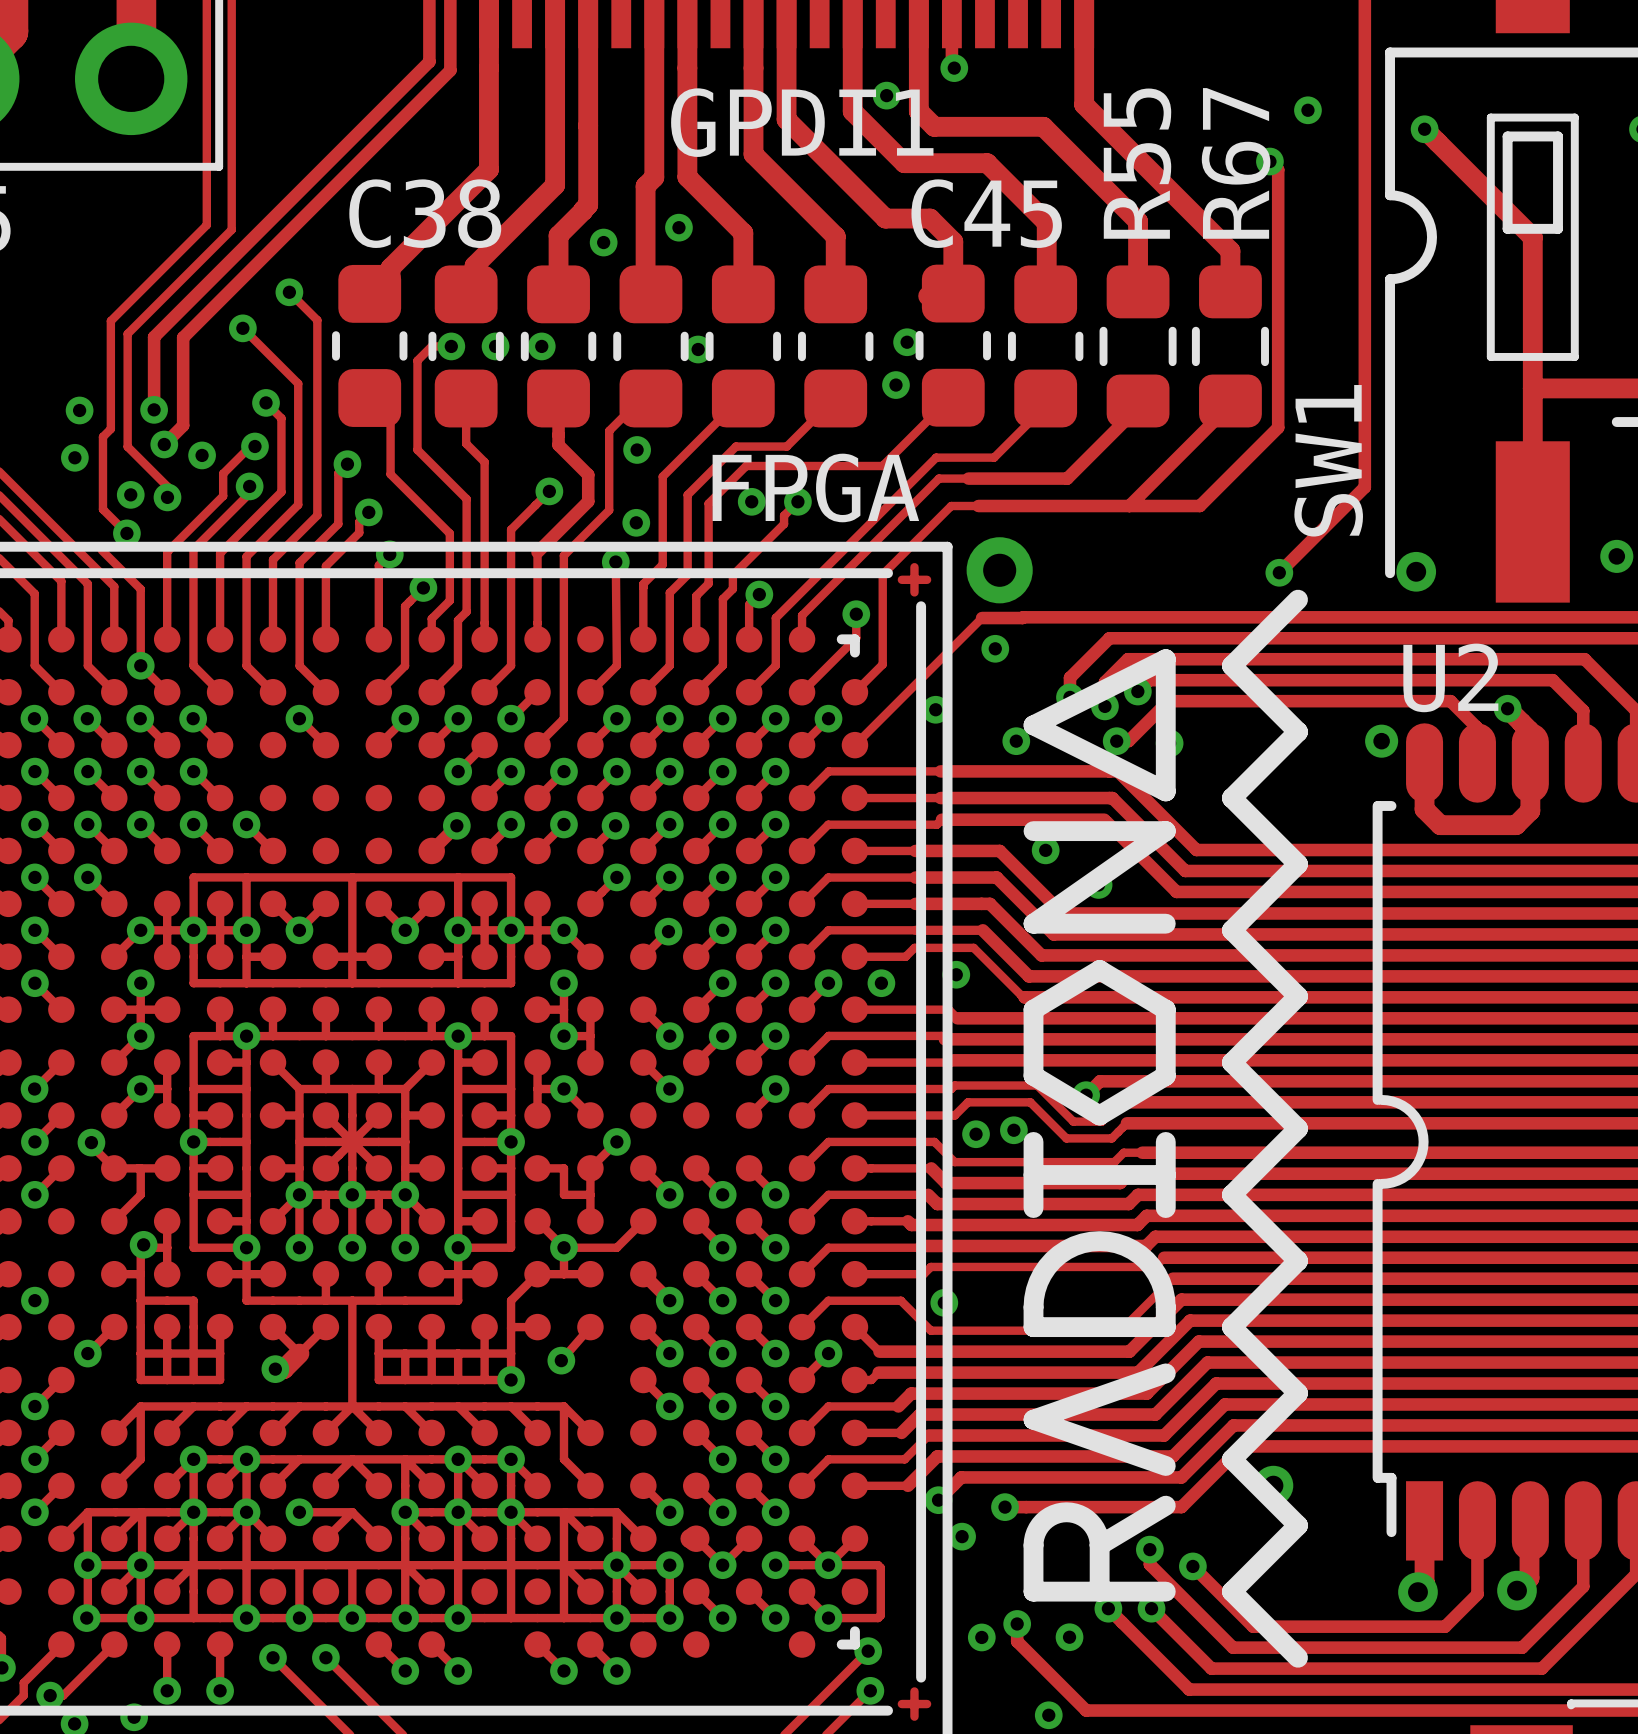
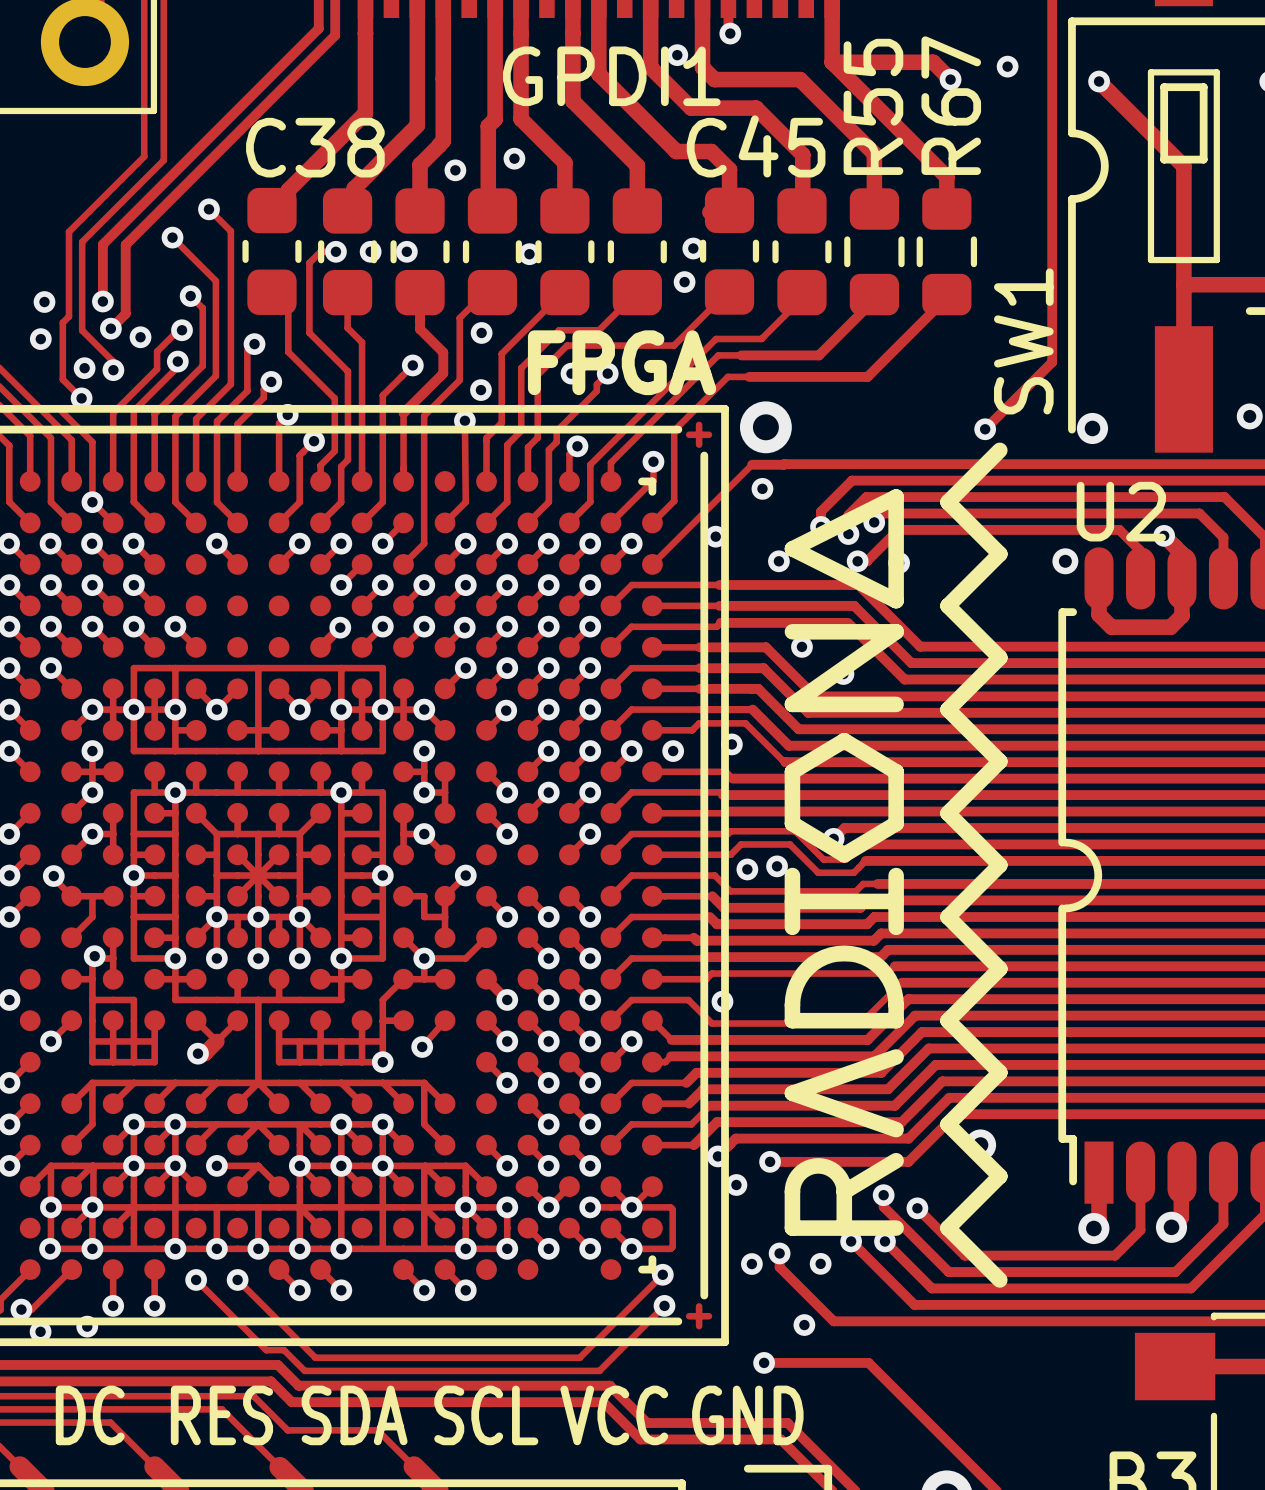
track: none -> (832, 62) (933, 62) (950, 79)
track: (1269, 161) (1278, 169) (1278, 427) (1199, 506) (1129, 506) -> none
via position: (1269, 161) -> (950, 79)

